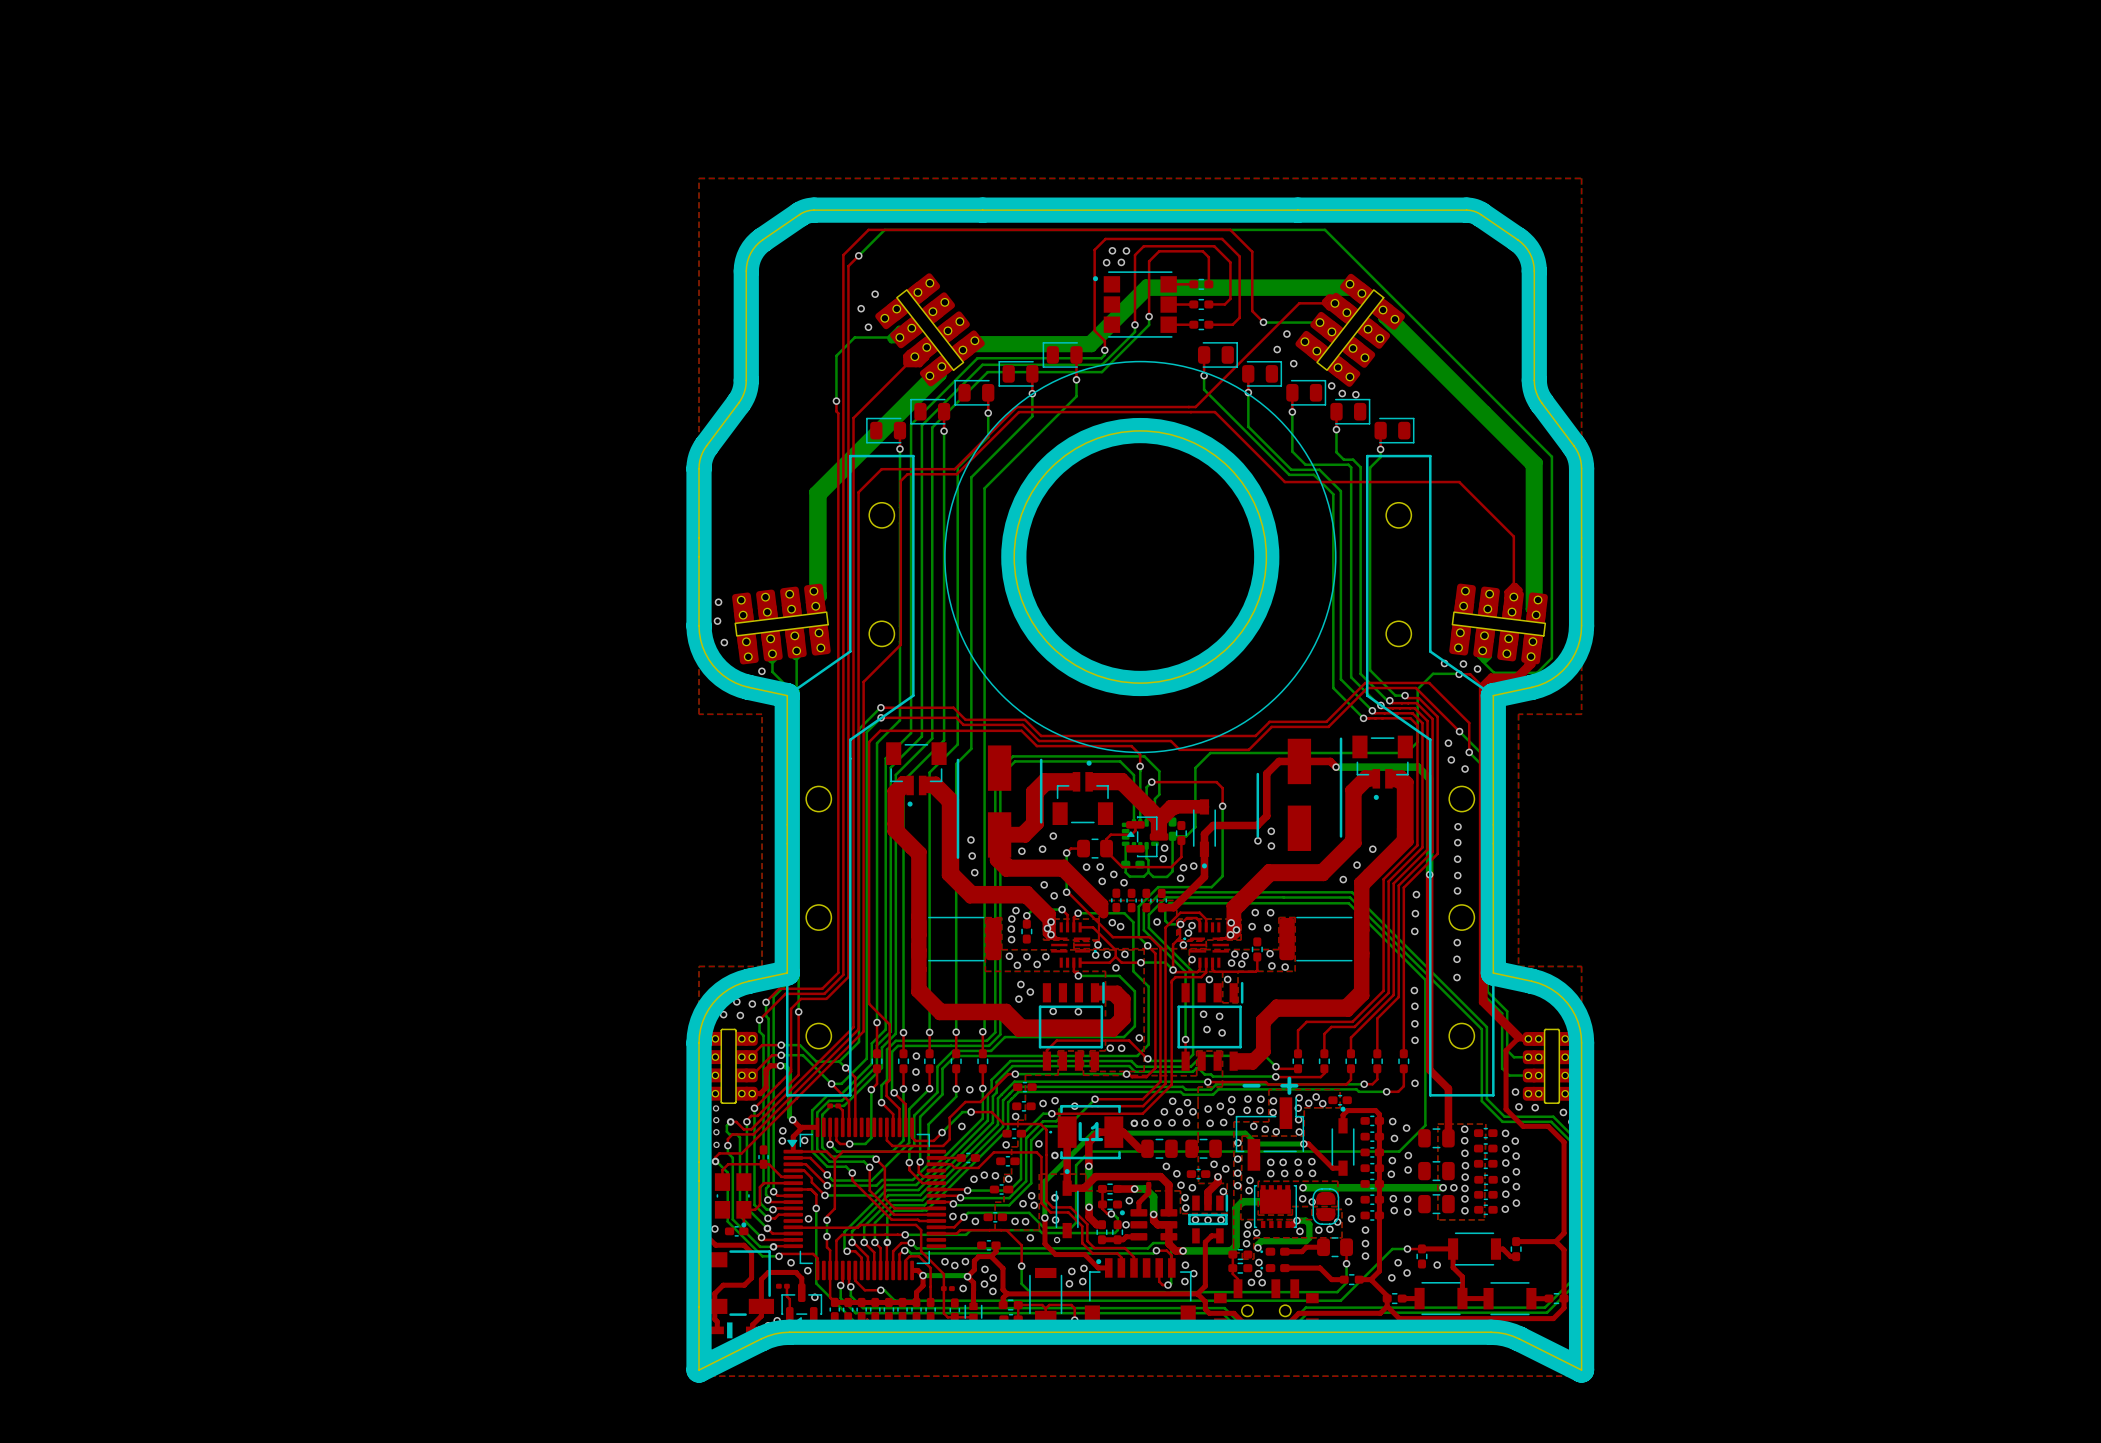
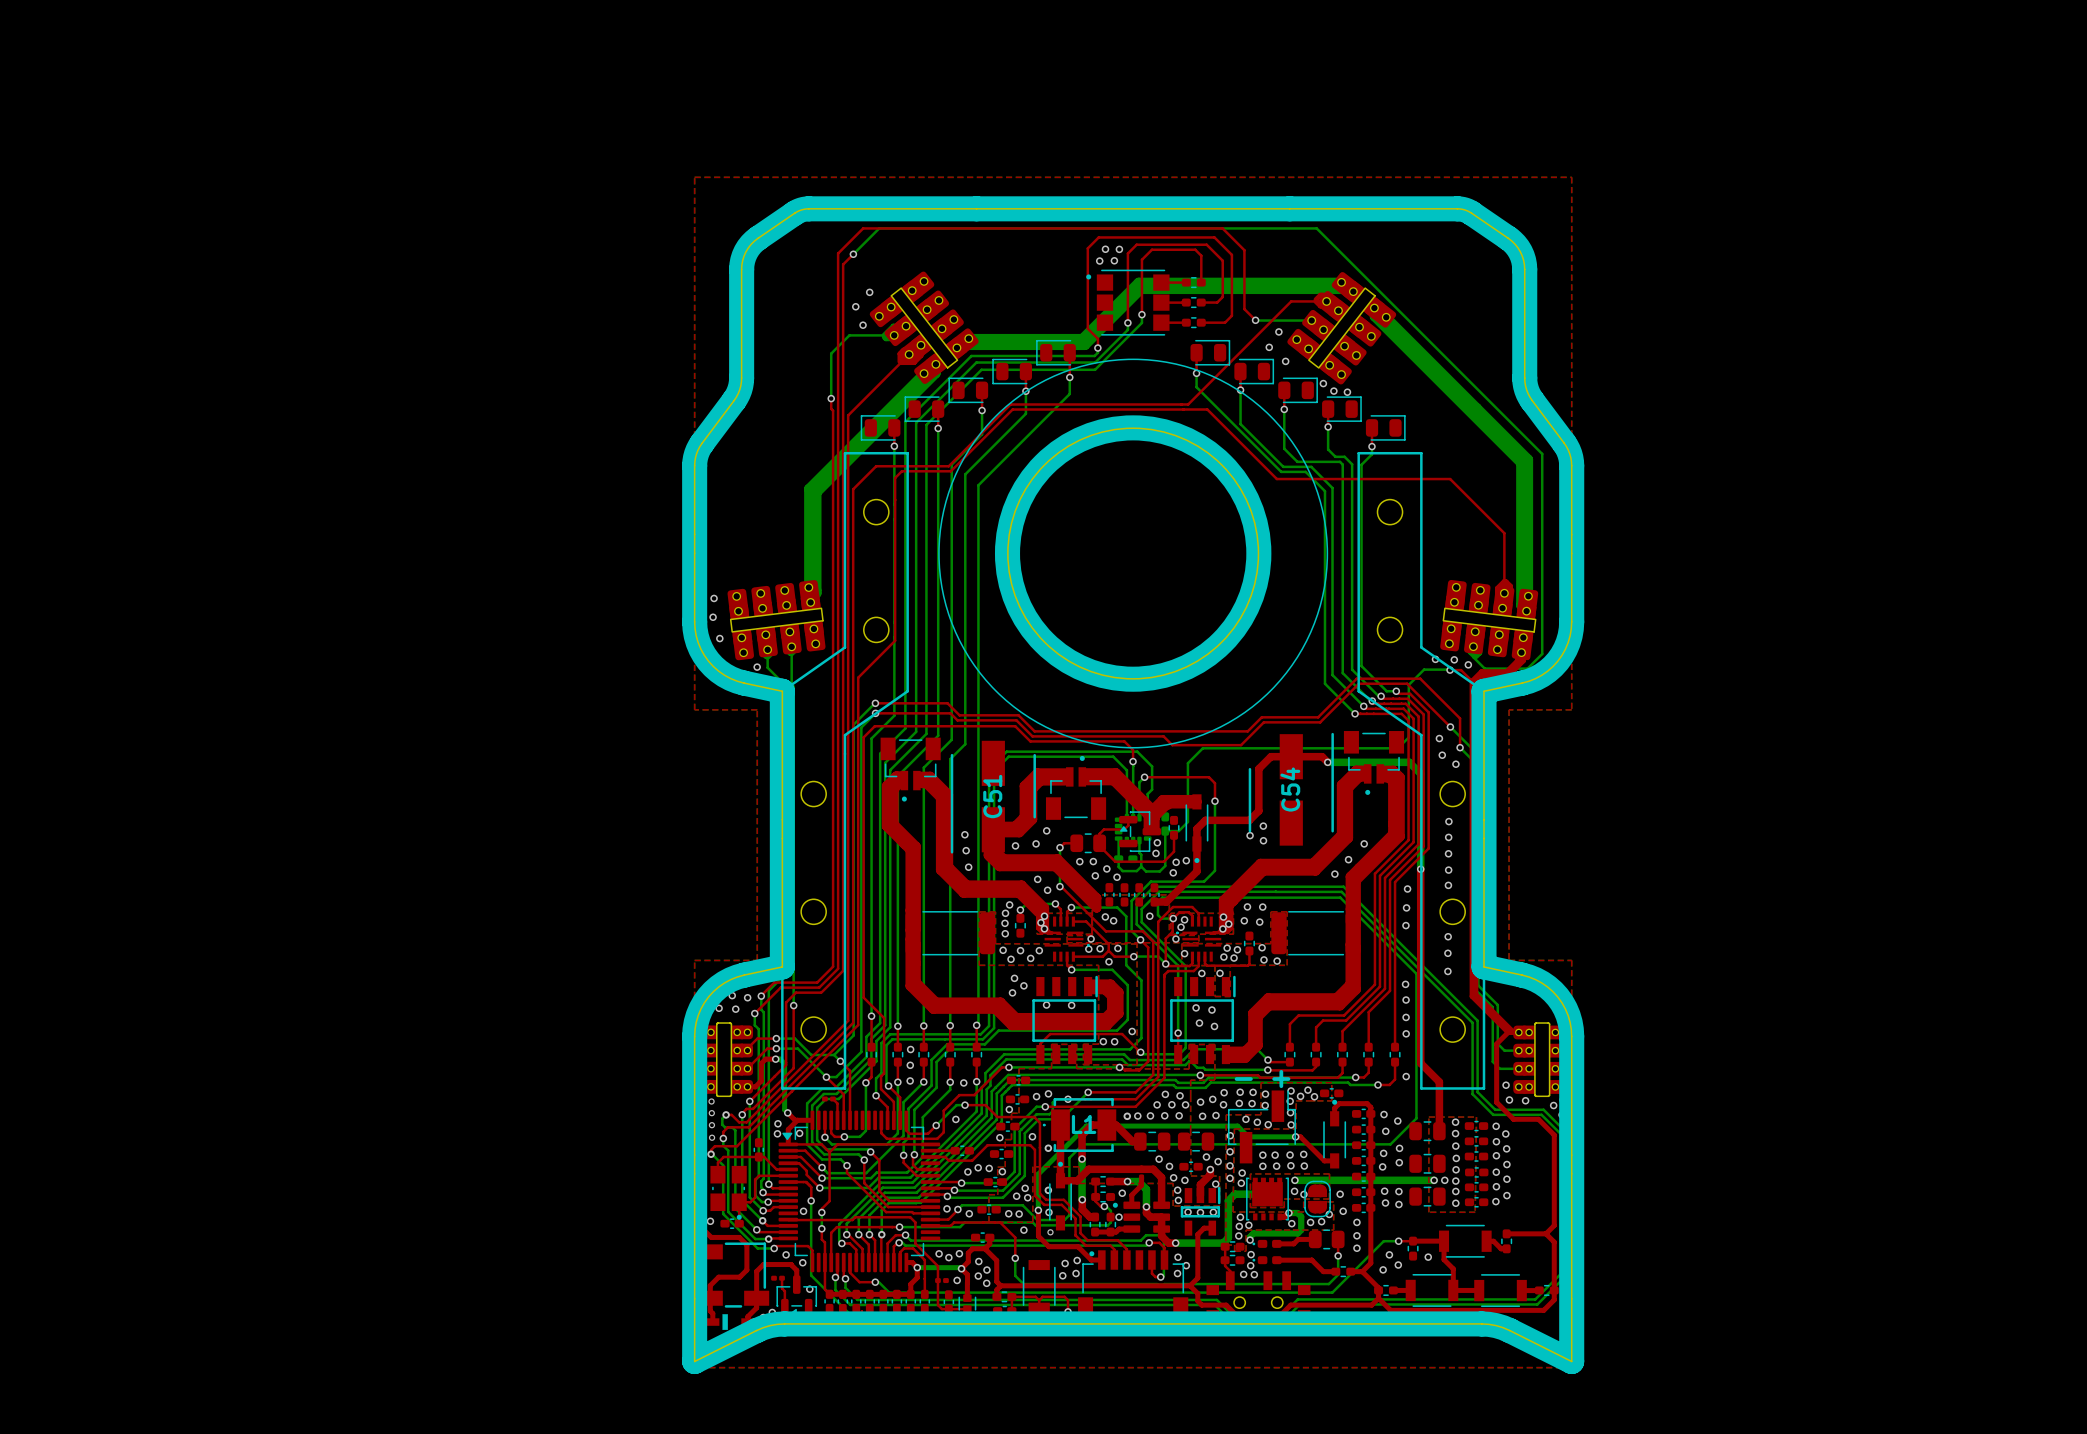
C54 name: none -> C54 (1290, 789)
C51 name: none -> C51 (992, 796)

